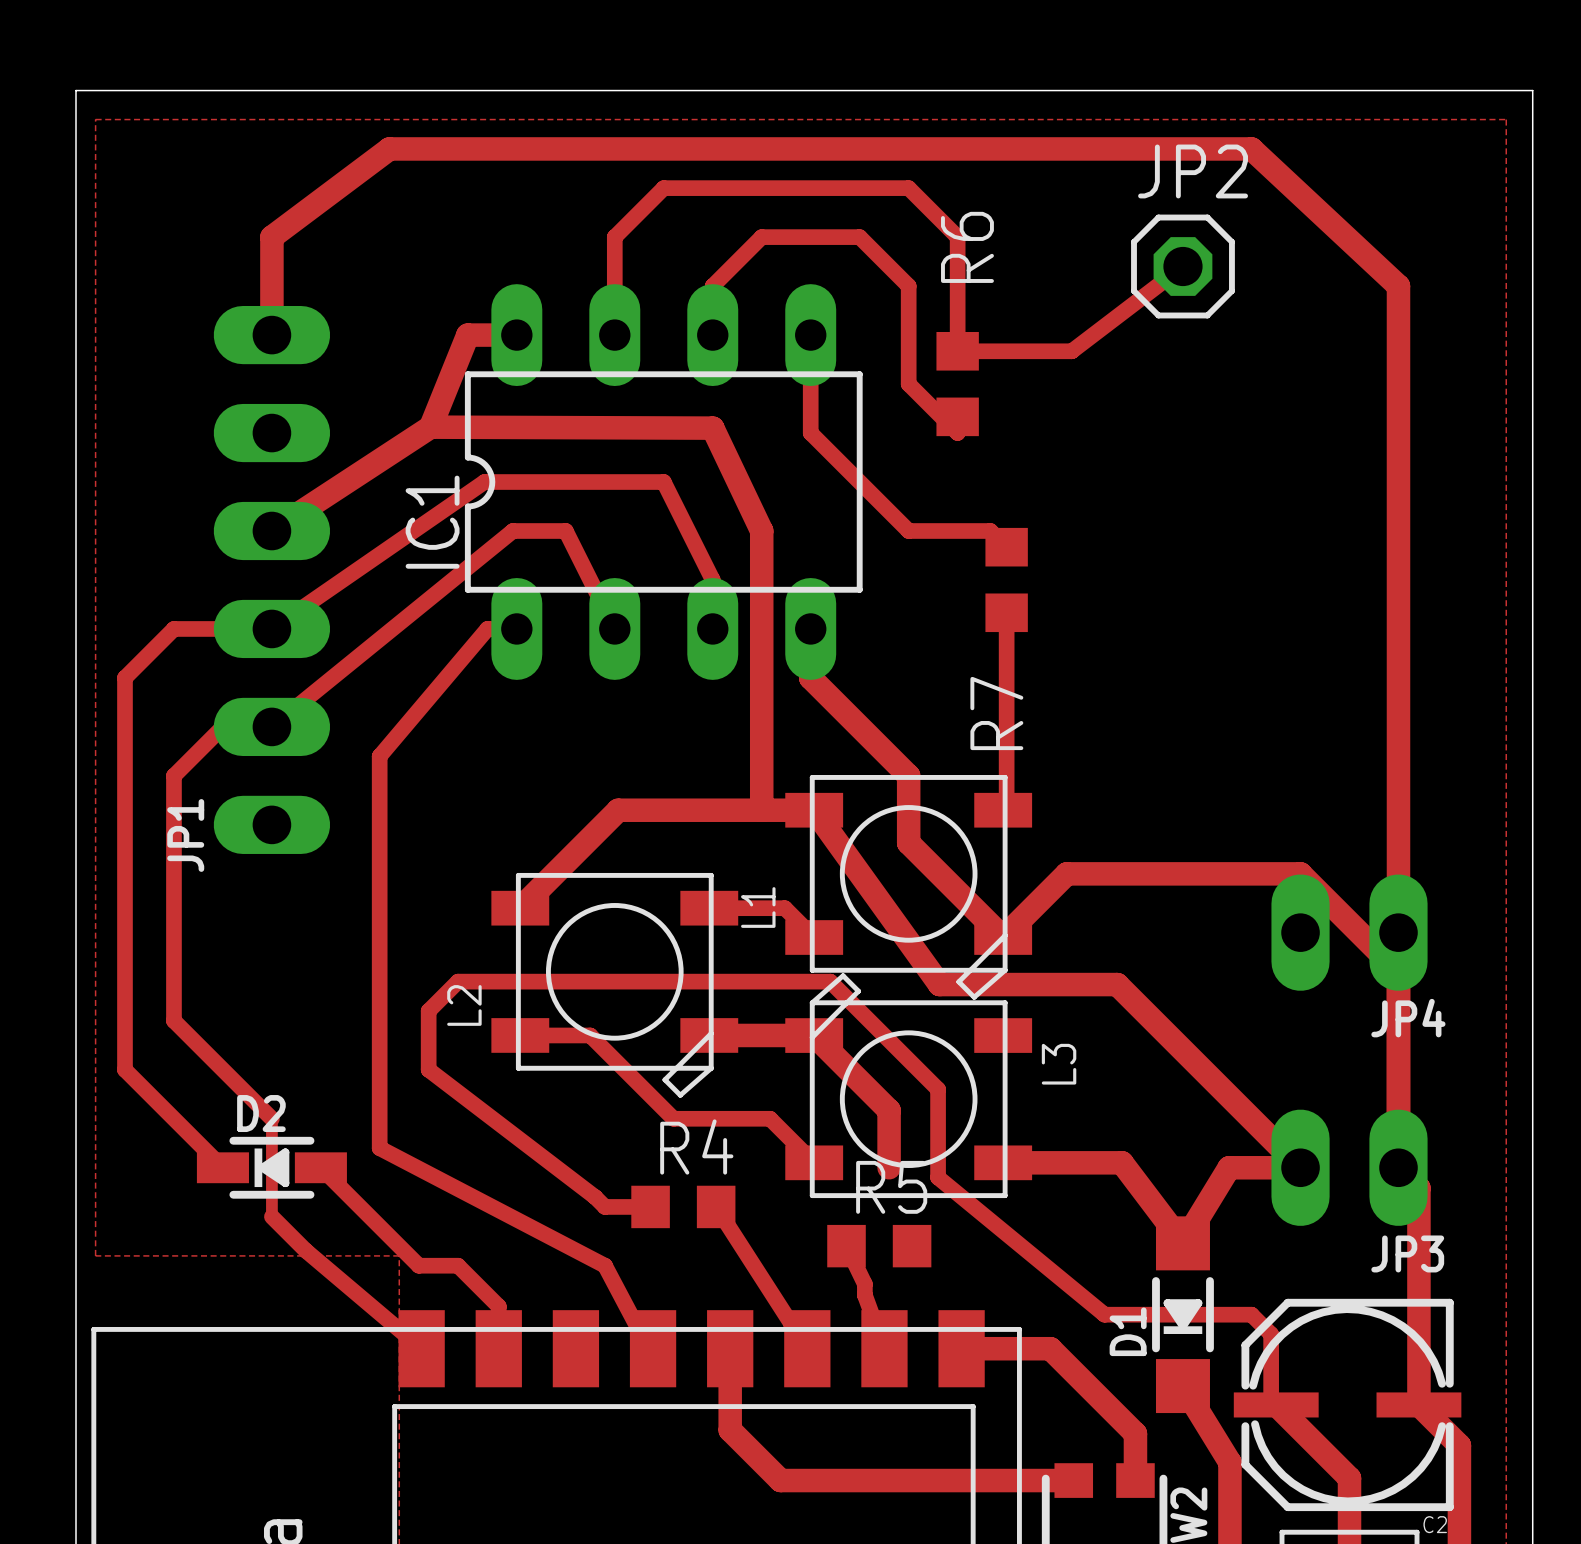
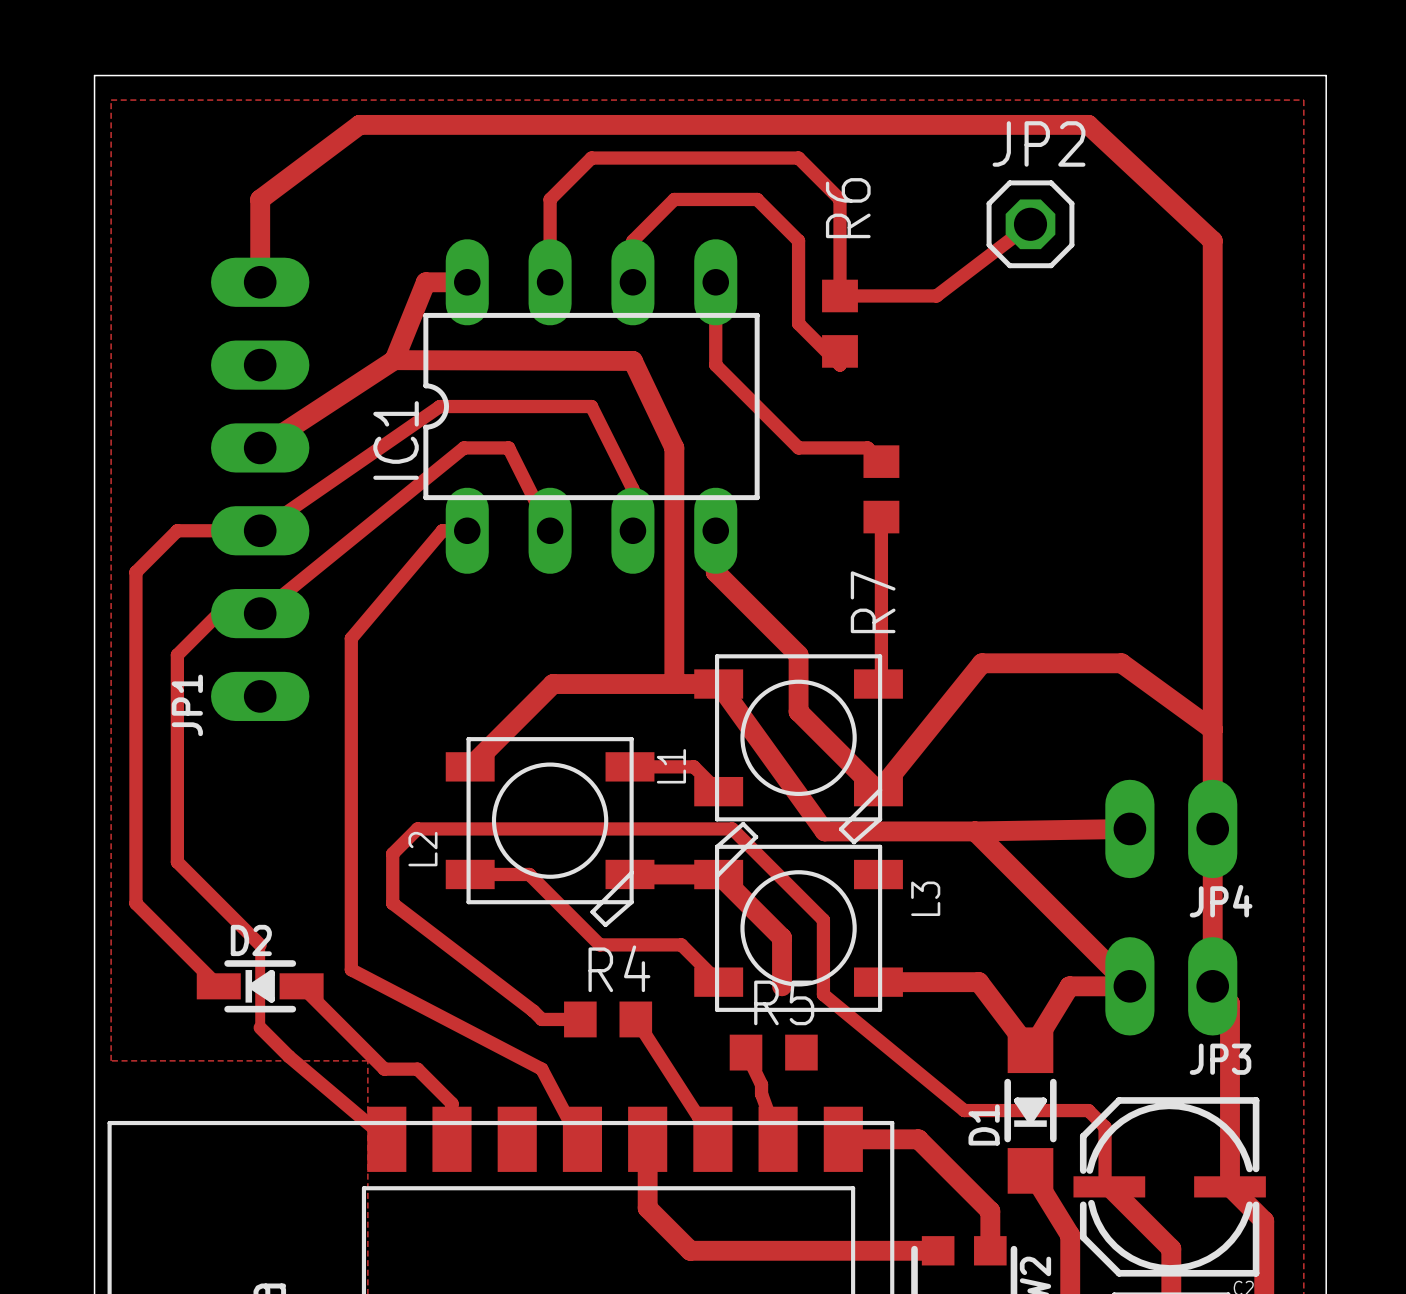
JP4 position: (1349, 932) -> (1171, 828)
top track: (1003, 937) (1066, 873) (1300, 873) (1398, 971) -> (878, 791) (981, 663) (1121, 663) (1212, 729)
top track: none -> (1129, 828) (975, 831)

